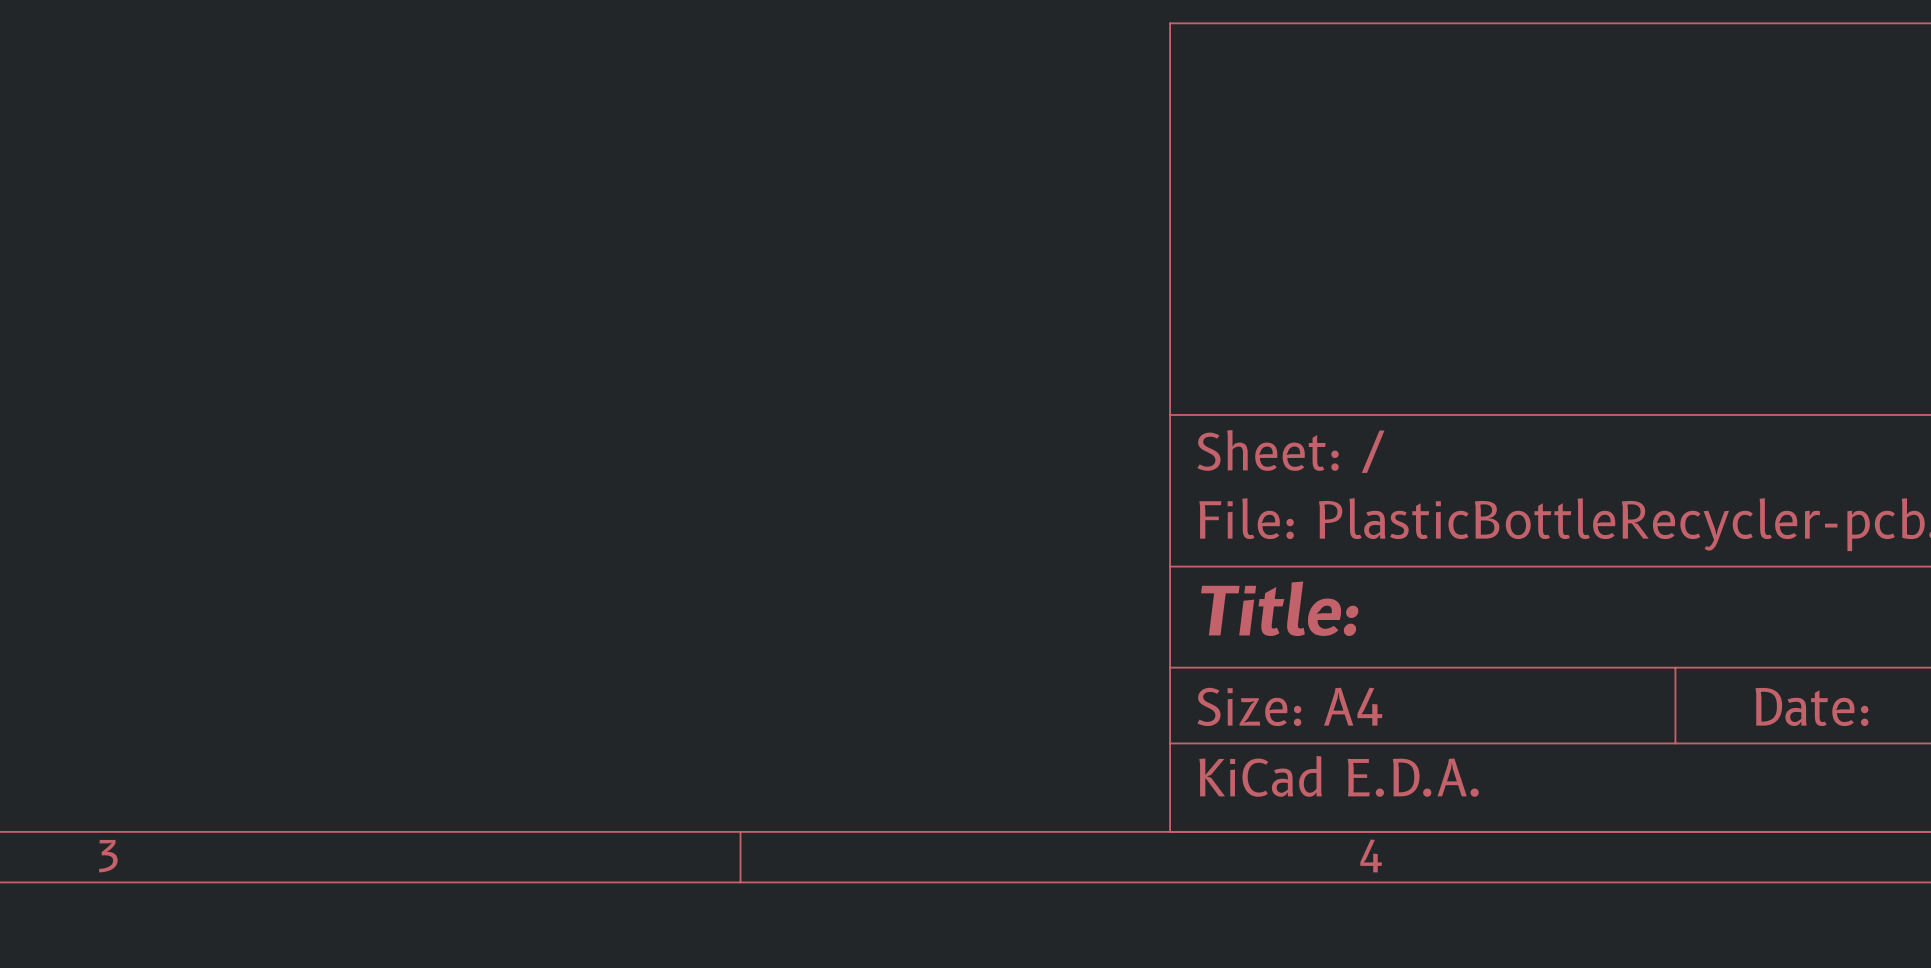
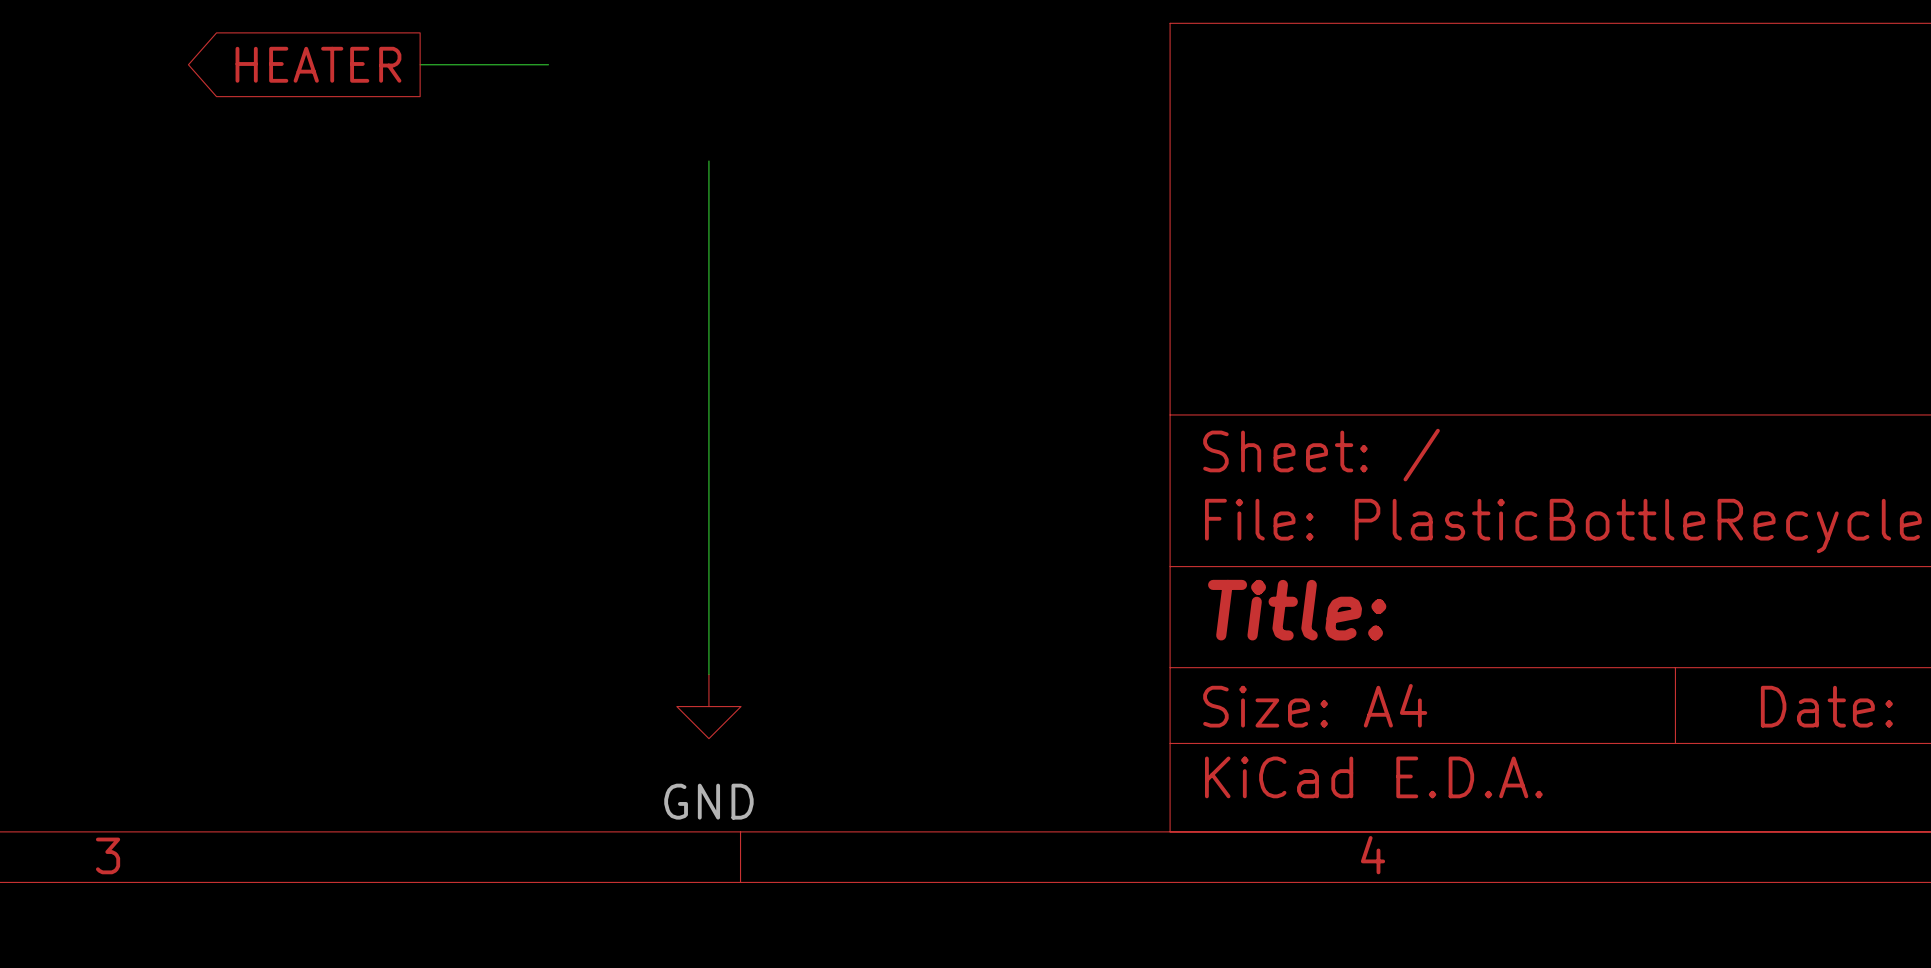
global label: none -> HEATER (318, 64)
wire: none -> (420, 64) (548, 64)
wire: none -> (708, 161) (708, 674)
power symbol: none -> GND (708, 706)

